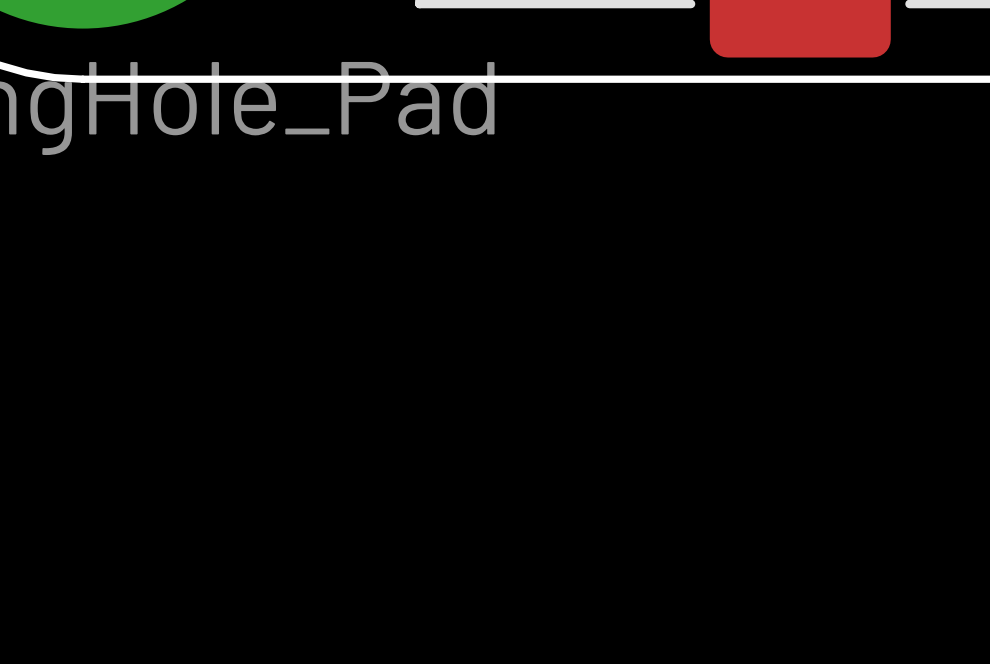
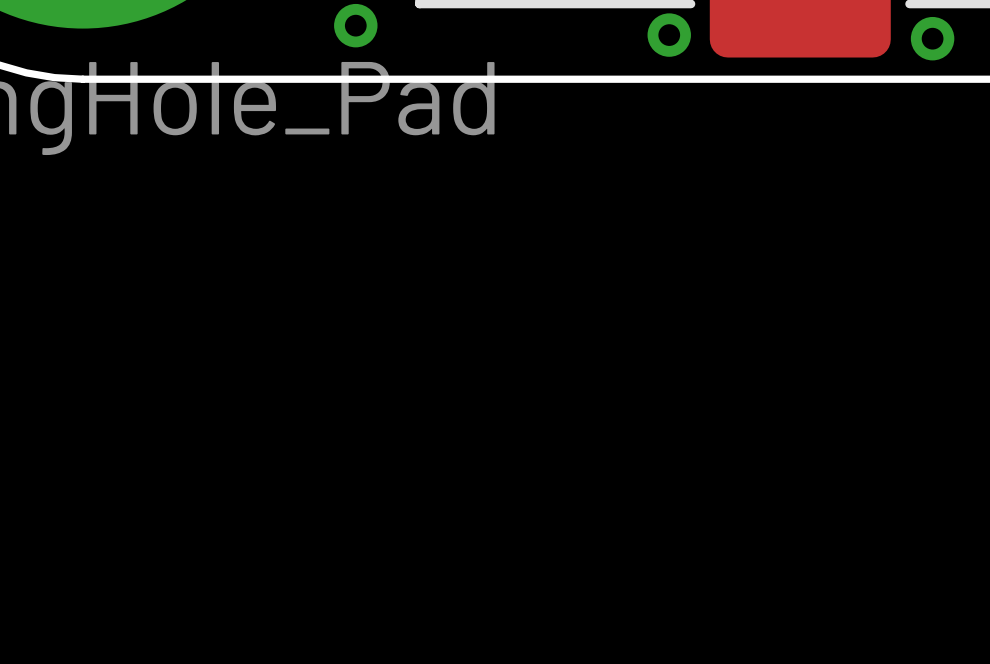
via: none -> (355, 25)
via: none -> (669, 35)
via: none -> (932, 38)

